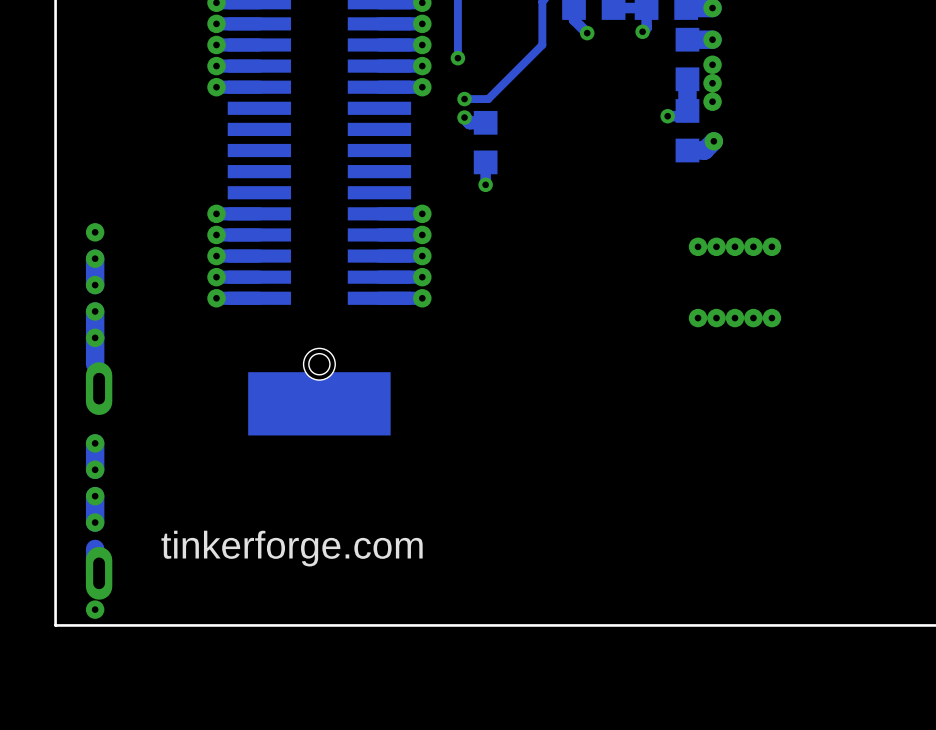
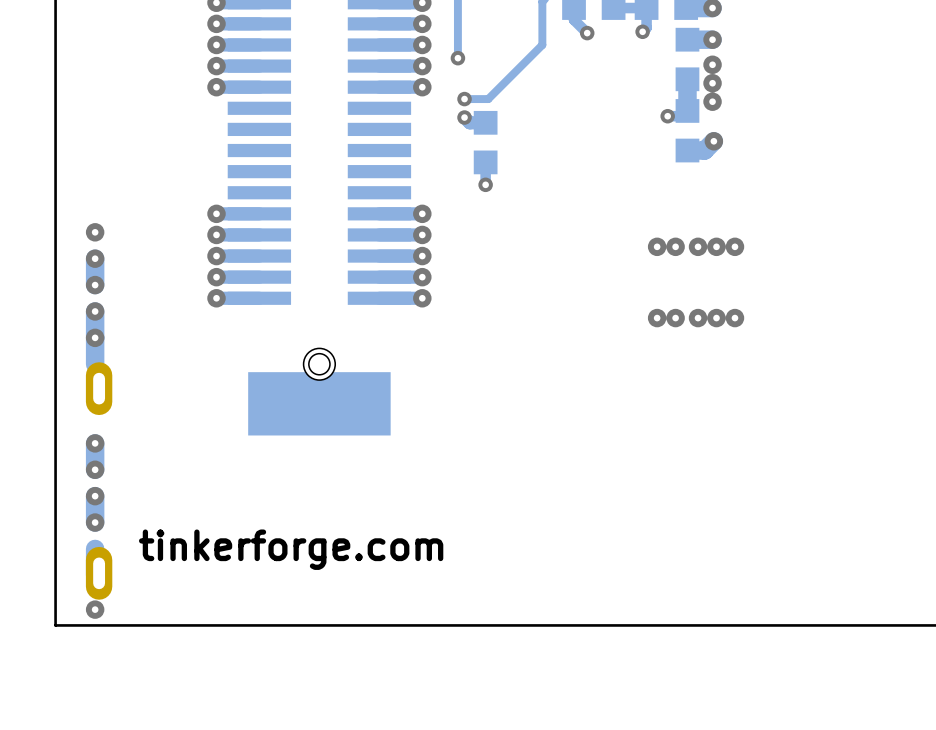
via: none -> (657, 246)
via: none -> (675, 246)
via: (753, 246) -> none
via: (771, 246) -> none
via: none -> (657, 318)
via: none -> (675, 318)
via: (753, 318) -> none
via: (771, 318) -> none

